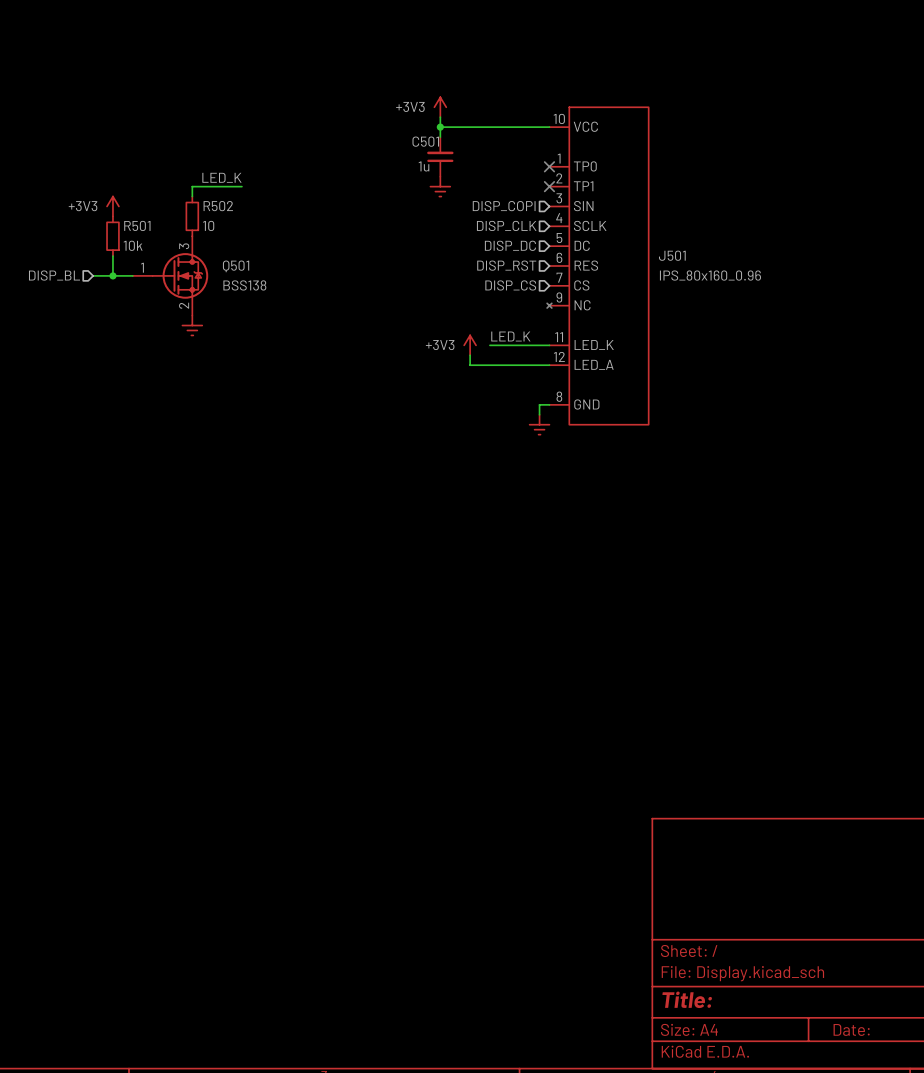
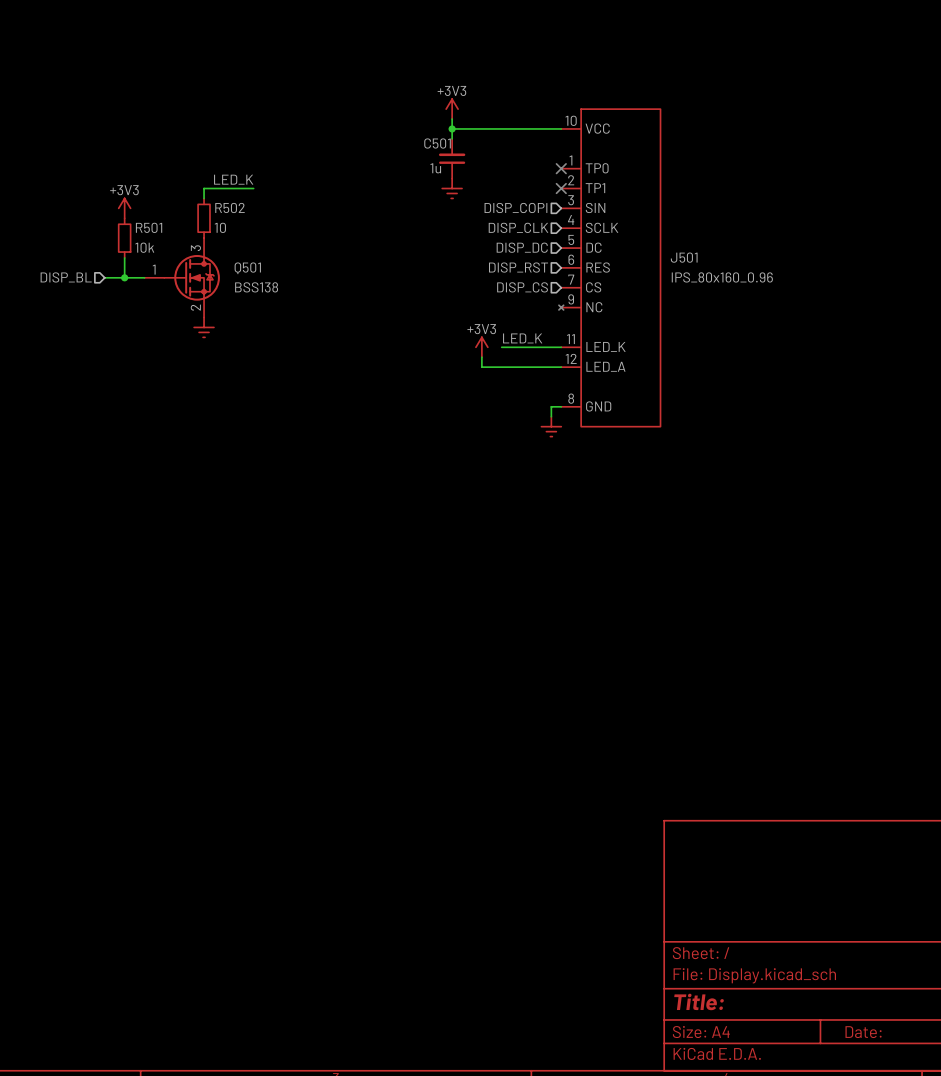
power symbol text position: +3V3 (410, 106) -> +3V3 (451, 90)
power symbol text position: +3V3 (83, 206) -> +3V3 (124, 190)
power symbol text position: +3V3 (440, 345) -> +3V3 (481, 329)

